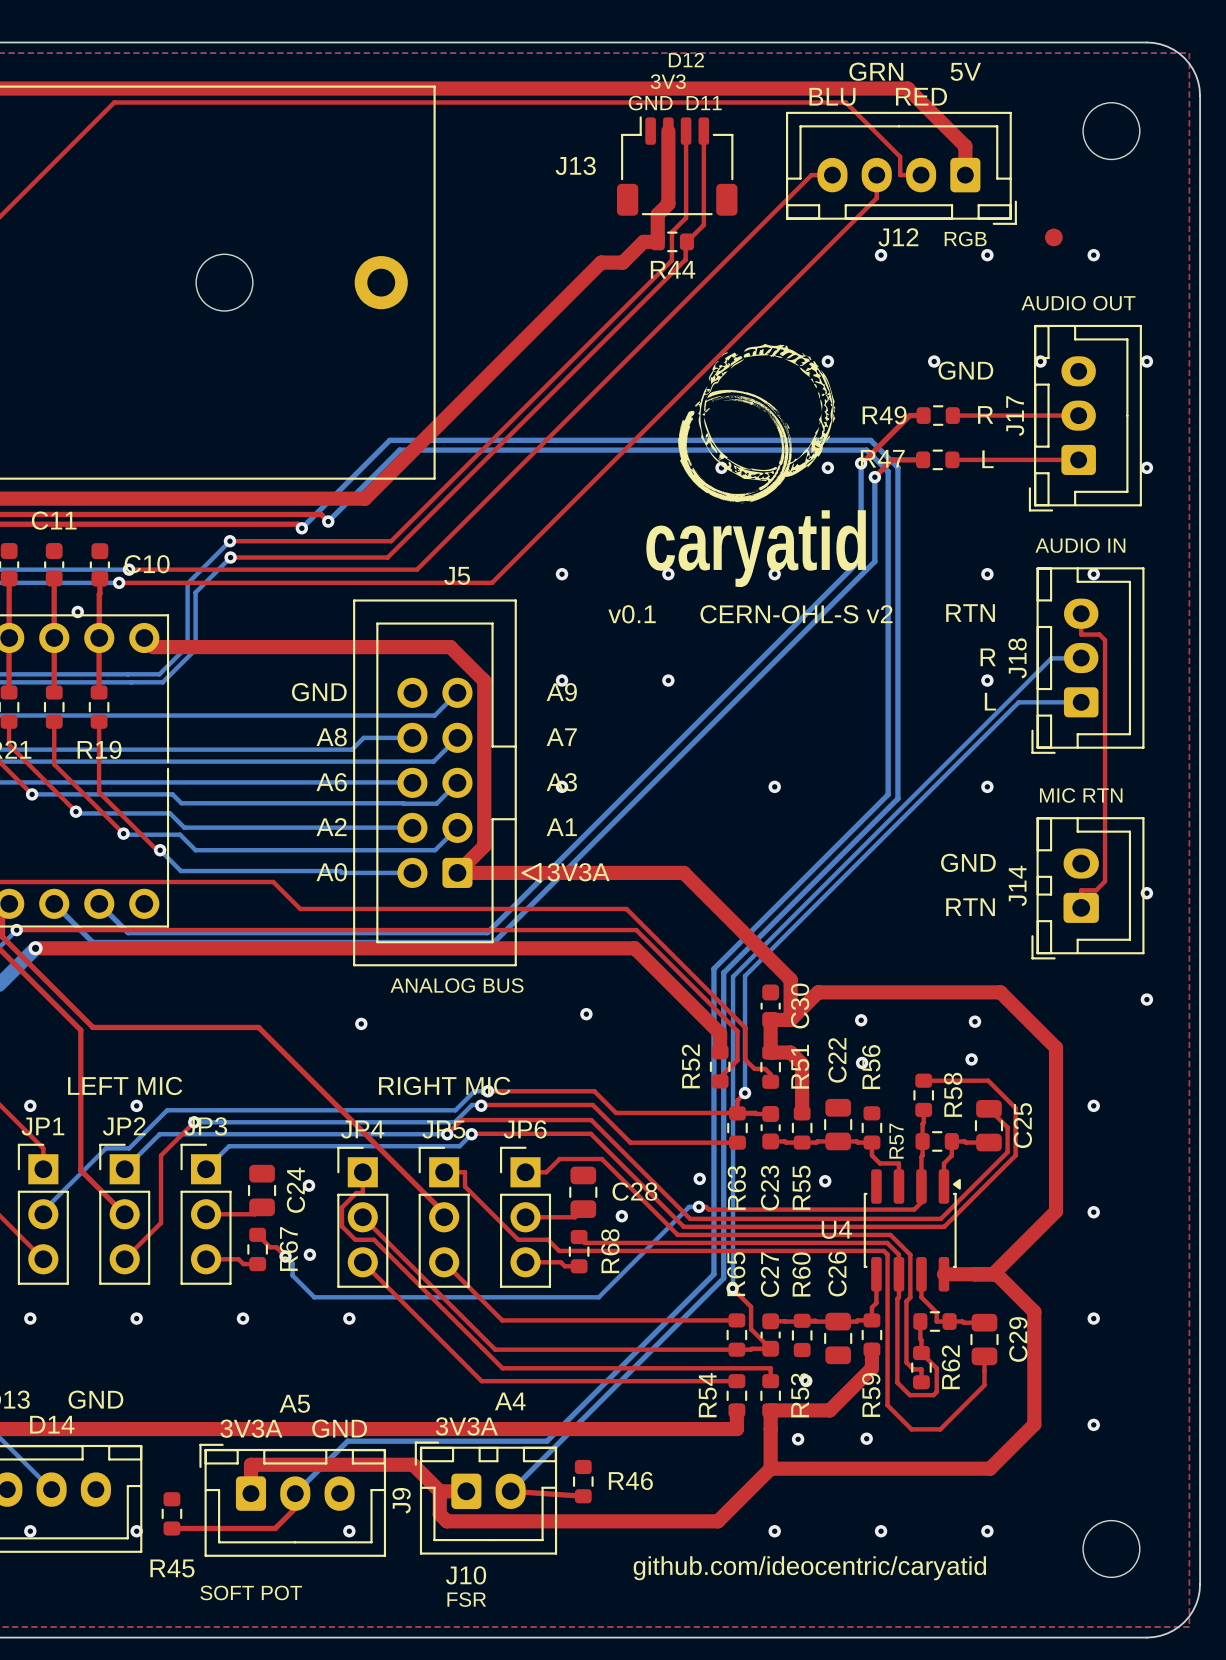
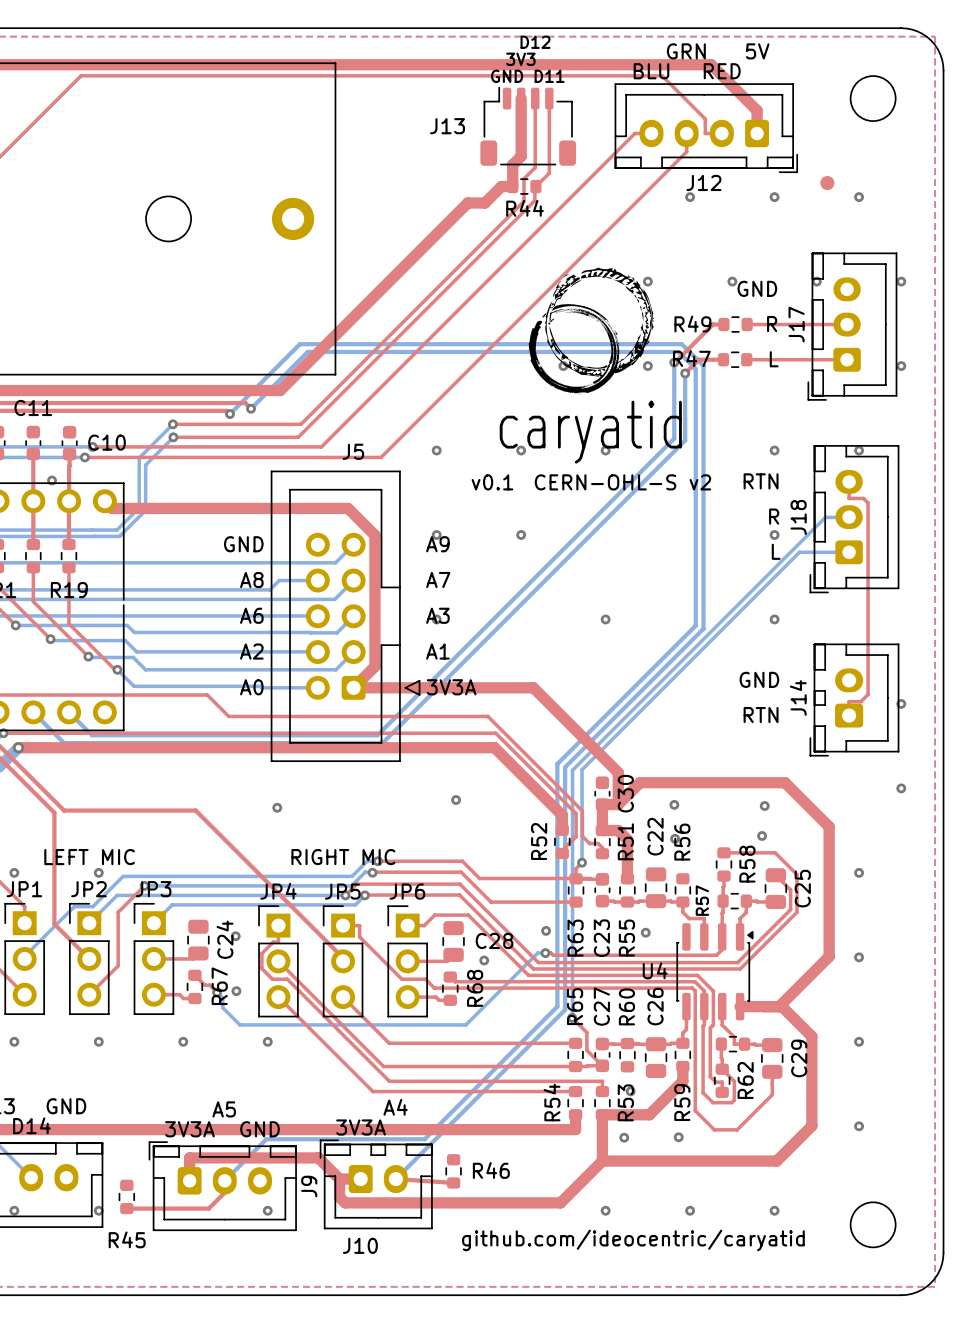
text: RGB (965, 239) -> none
text: AUDIO OUT (1078, 303) -> none
text: AUDIO IN (1080, 545) -> none
text: MIC RTN (1081, 795) -> none
text: ANALOG BUS (457, 985) -> none
text: SOFT POT (251, 1592) -> none
text: FSR (466, 1599) -> none

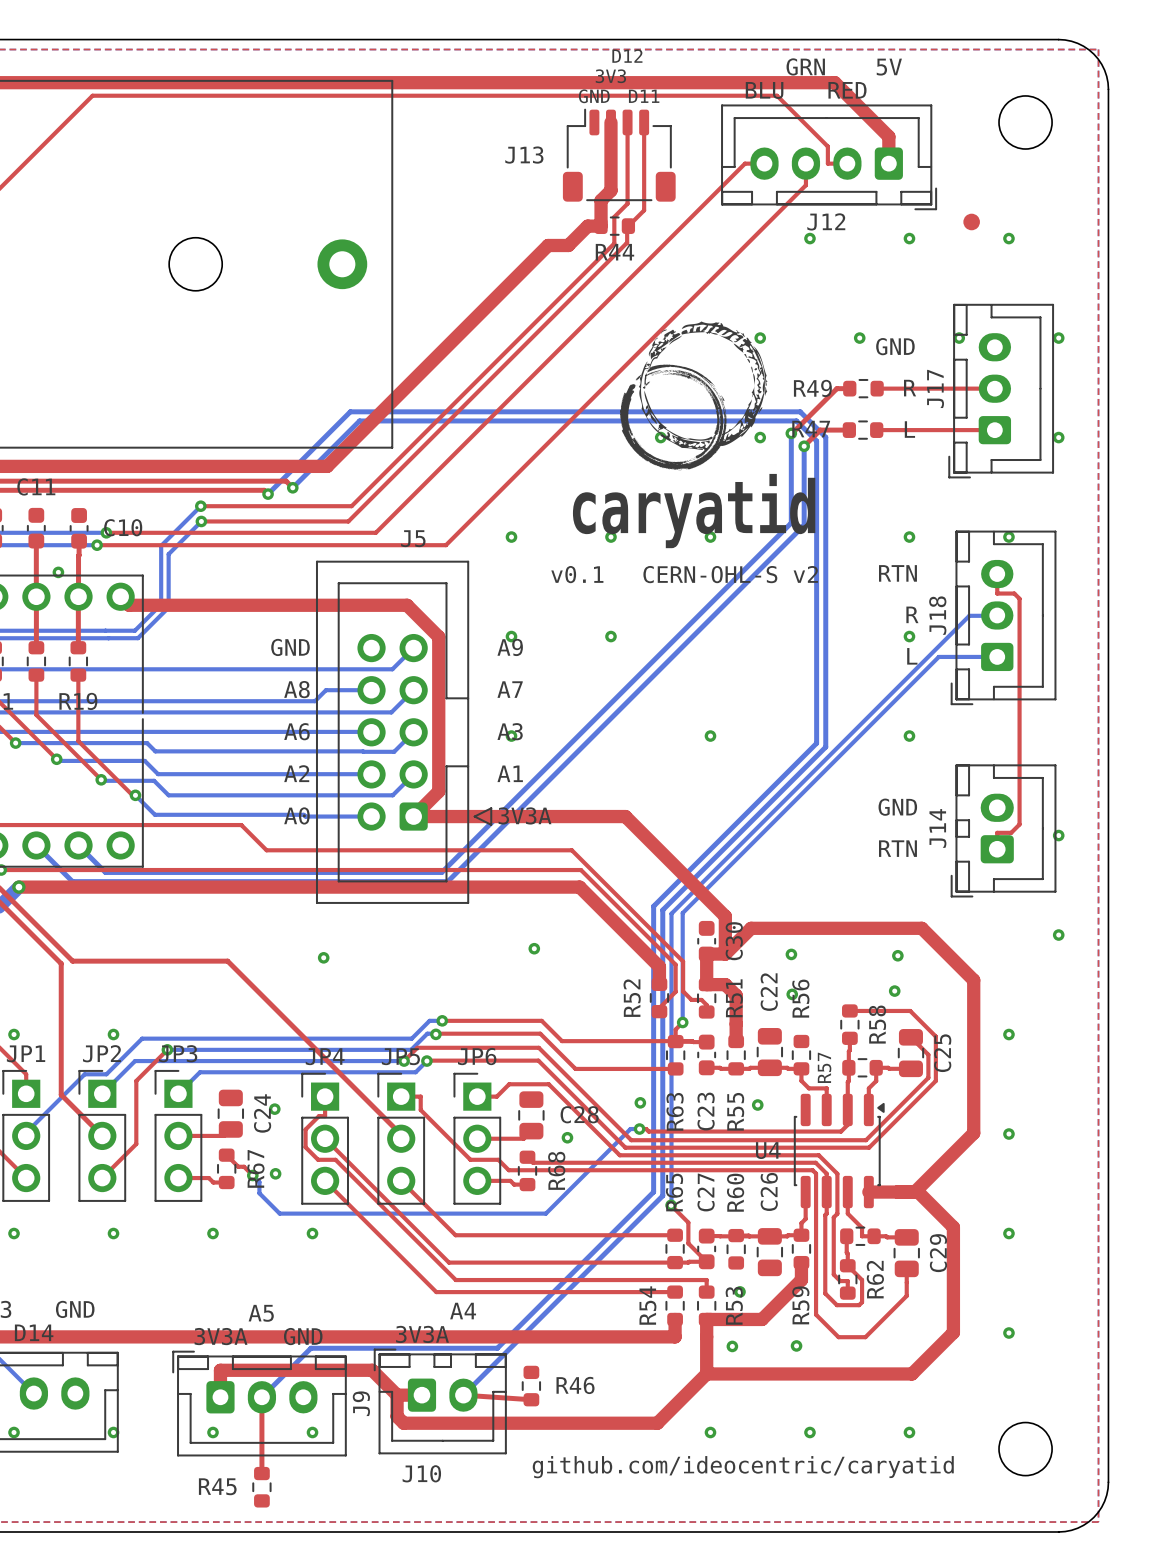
text: LEFT MIC (89, 857) -> none
text: RIGHT MIC (343, 857) -> none
top track: (224, 1192) (208, 1208) (126, 1208) -> (261, 1411) (261, 1473)
R45 position: (126, 1196) -> (261, 1487)
via: none -> (213, 1432)
R45 name position: R45 (127, 1239) -> R45 (217, 1486)

